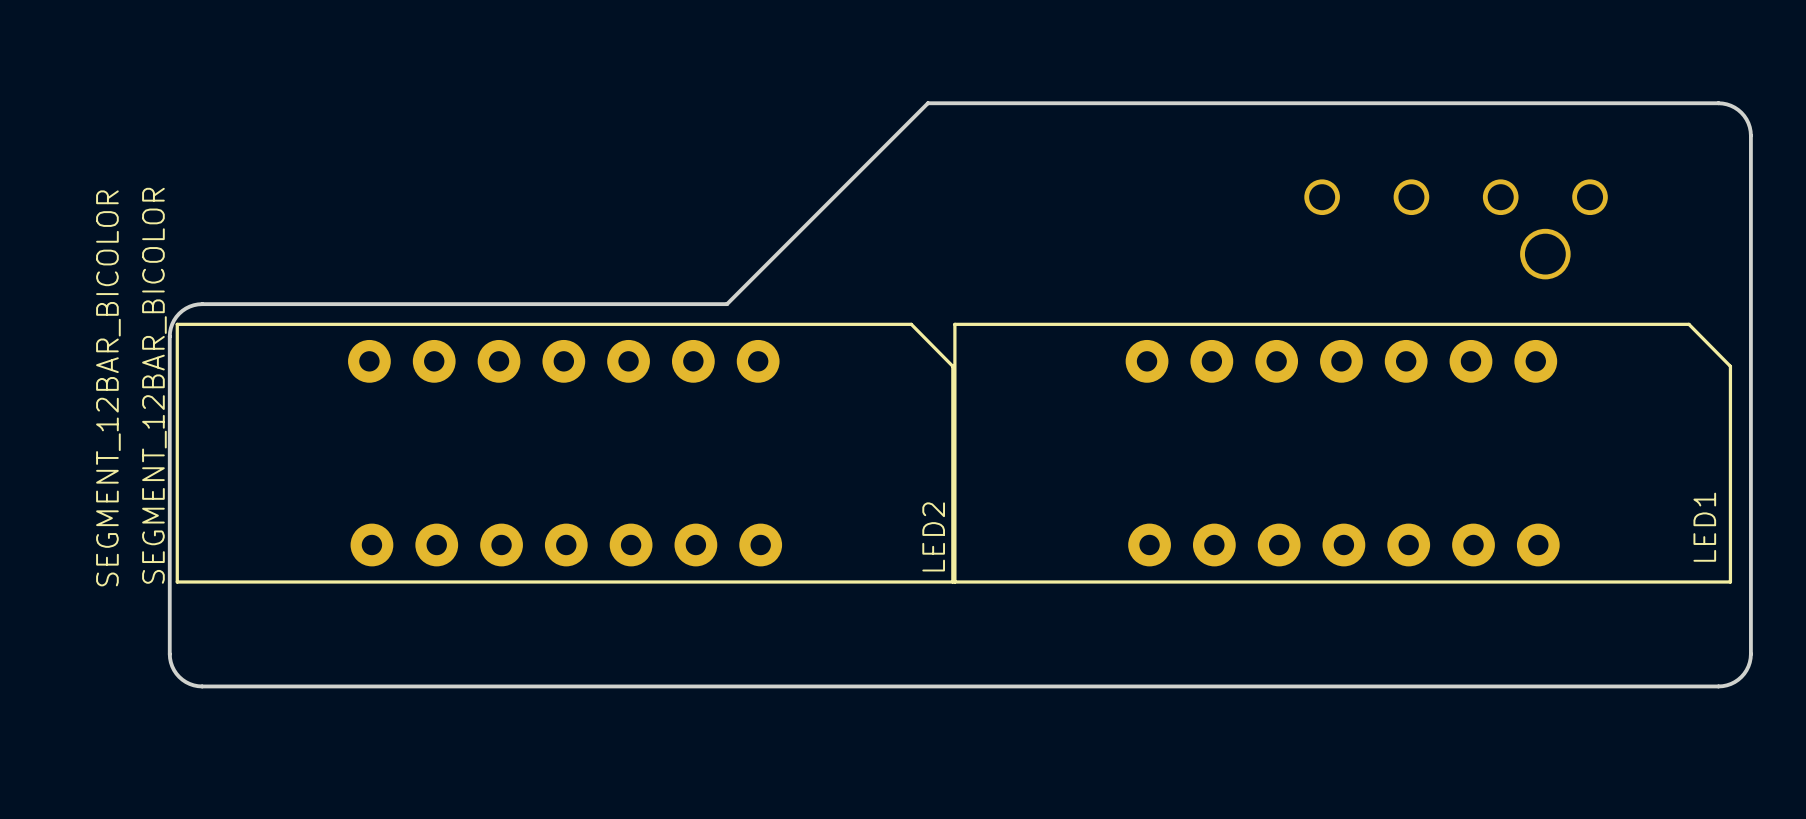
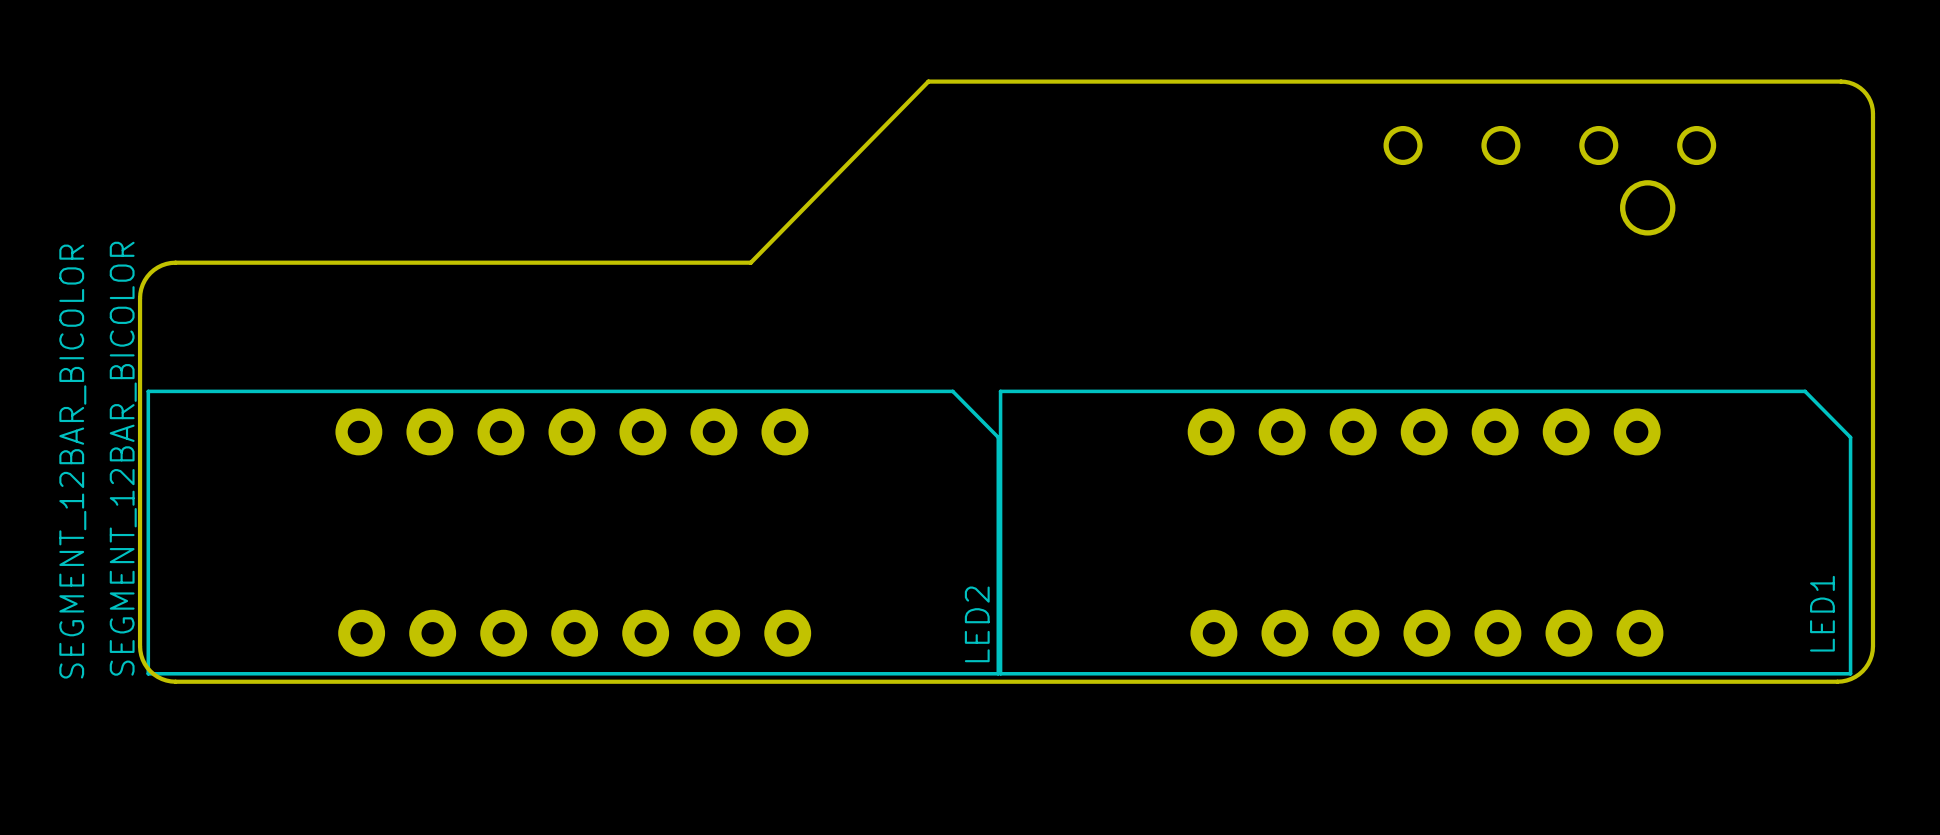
board edge: (1750, 168) (1750, 135) (1748, 123) (1738, 109) (1722, 103) (927, 103) (727, 304) -> (1873, 113) (1870, 101) (1863, 90) (1853, 84) (1841, 81) (928, 81) (750, 262)
LED2 position: (565, 453) -> (573, 532)
LED1 position: (1342, 453) -> (1425, 532)

